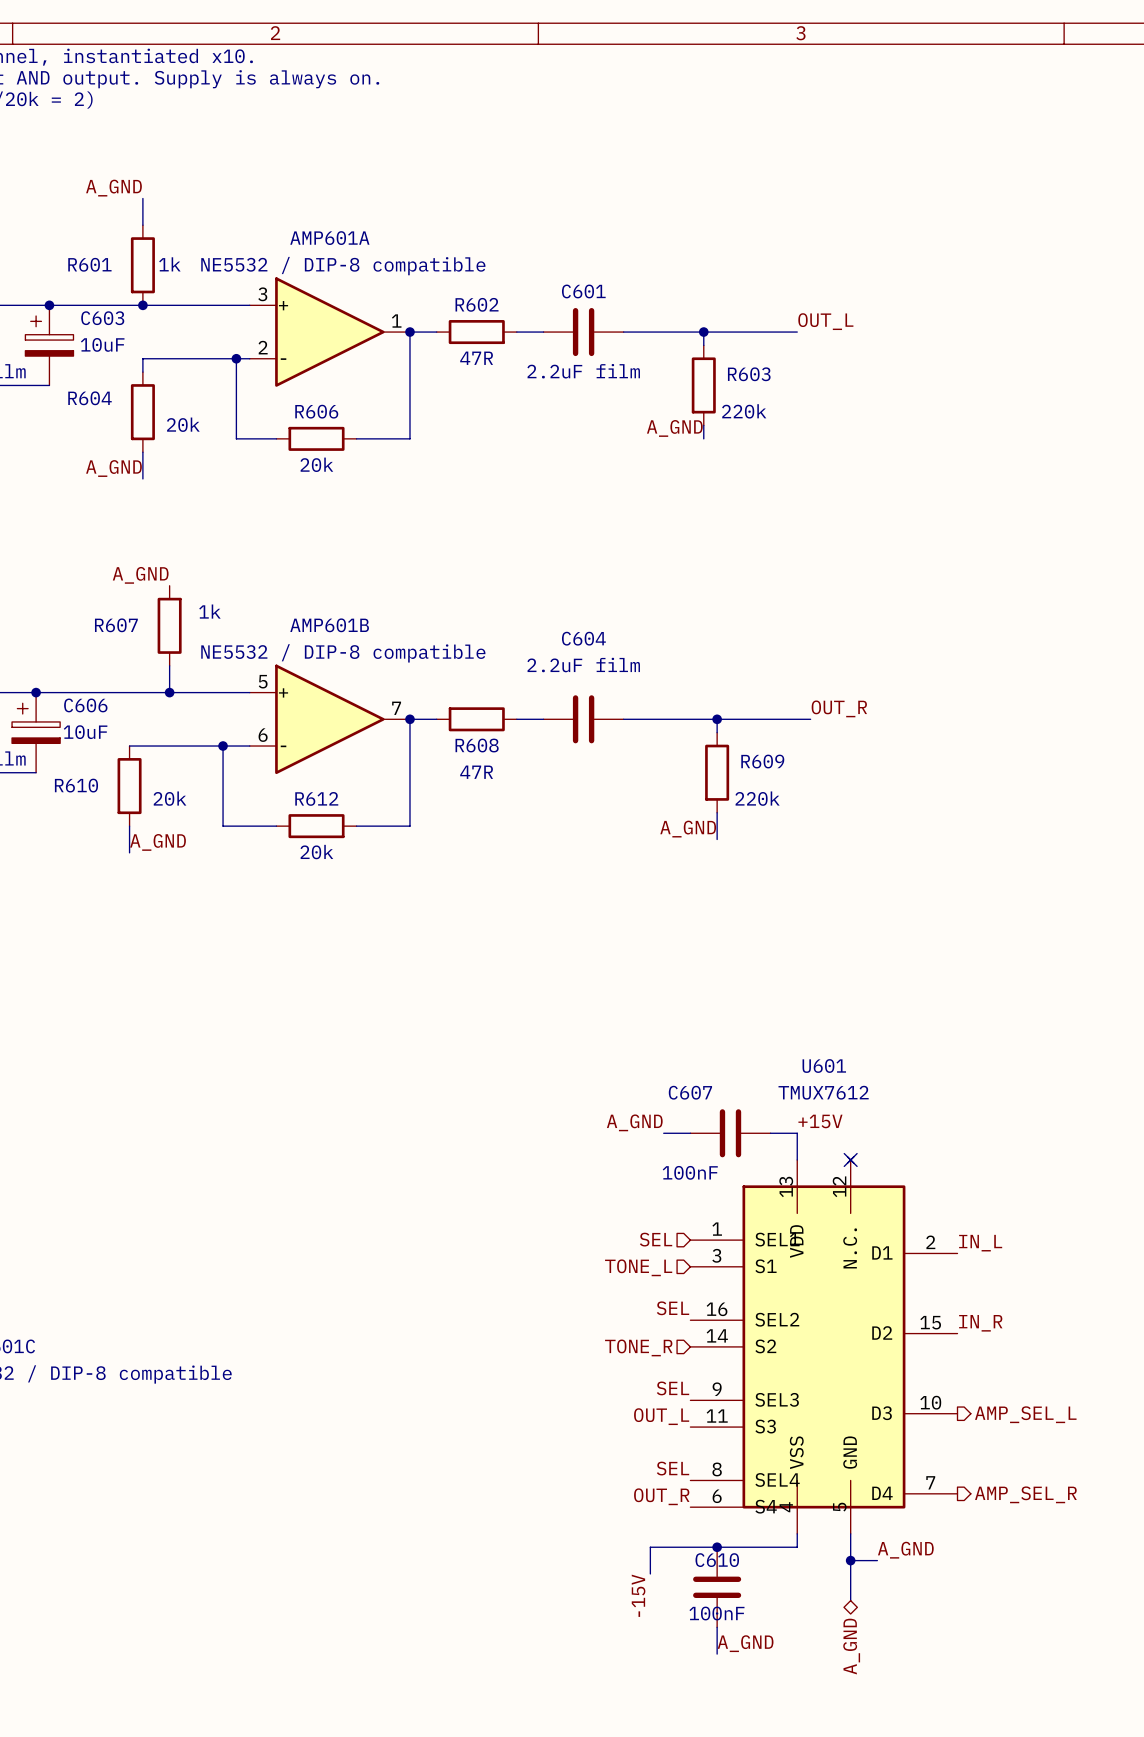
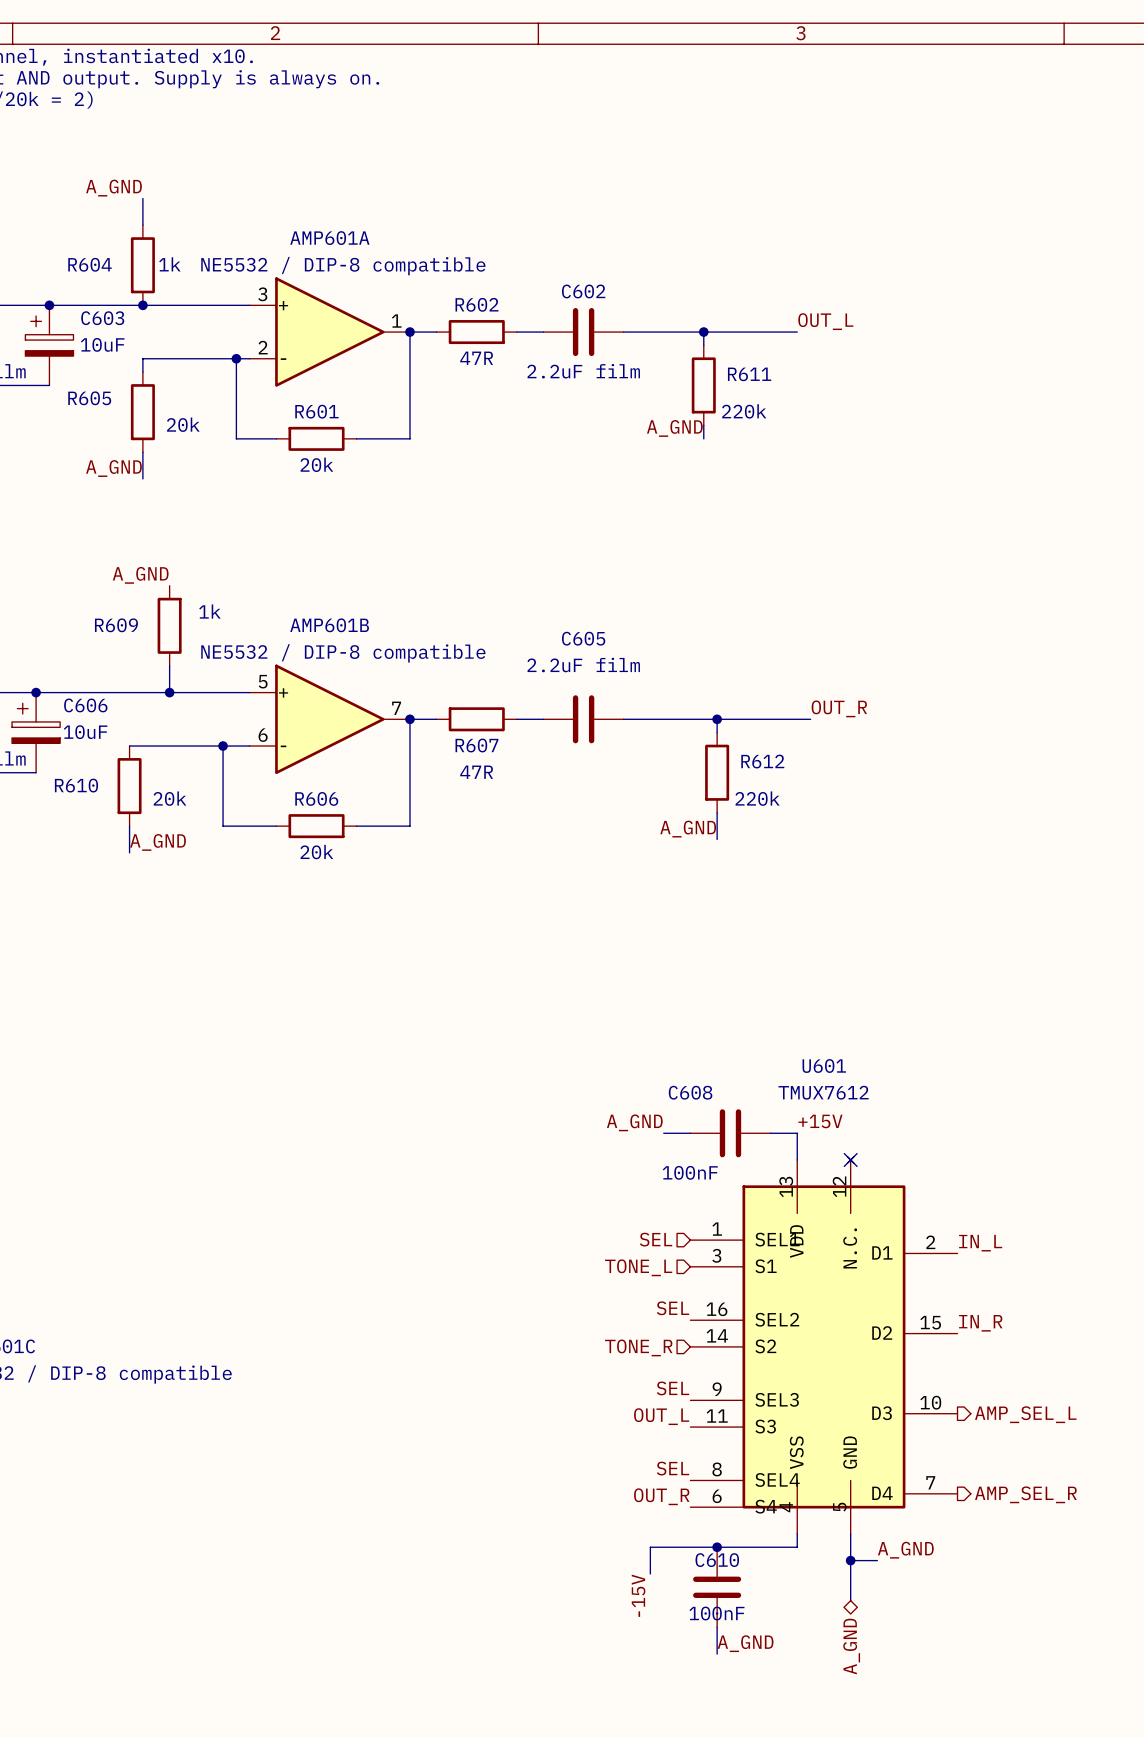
R601 name: R601 (89, 264) -> R604 (89, 264)
C601 name: C601 (583, 291) -> C602 (583, 291)
R603 name: R603 (749, 374) -> R611 (749, 374)
R604 name: R604 (89, 398) -> R605 (89, 398)
R606 name: R606 (316, 411) -> R601 (316, 411)
R607 name: R607 (116, 625) -> R609 (116, 625)
C604 name: C604 (583, 638) -> C605 (583, 638)
R608 name: R608 (477, 745) -> R607 (476, 745)
R609 name: R609 (762, 761) -> R612 (762, 761)
R612 name: R612 (316, 798) -> R606 (316, 798)
C607 name: C607 (690, 1092) -> C608 (690, 1092)

